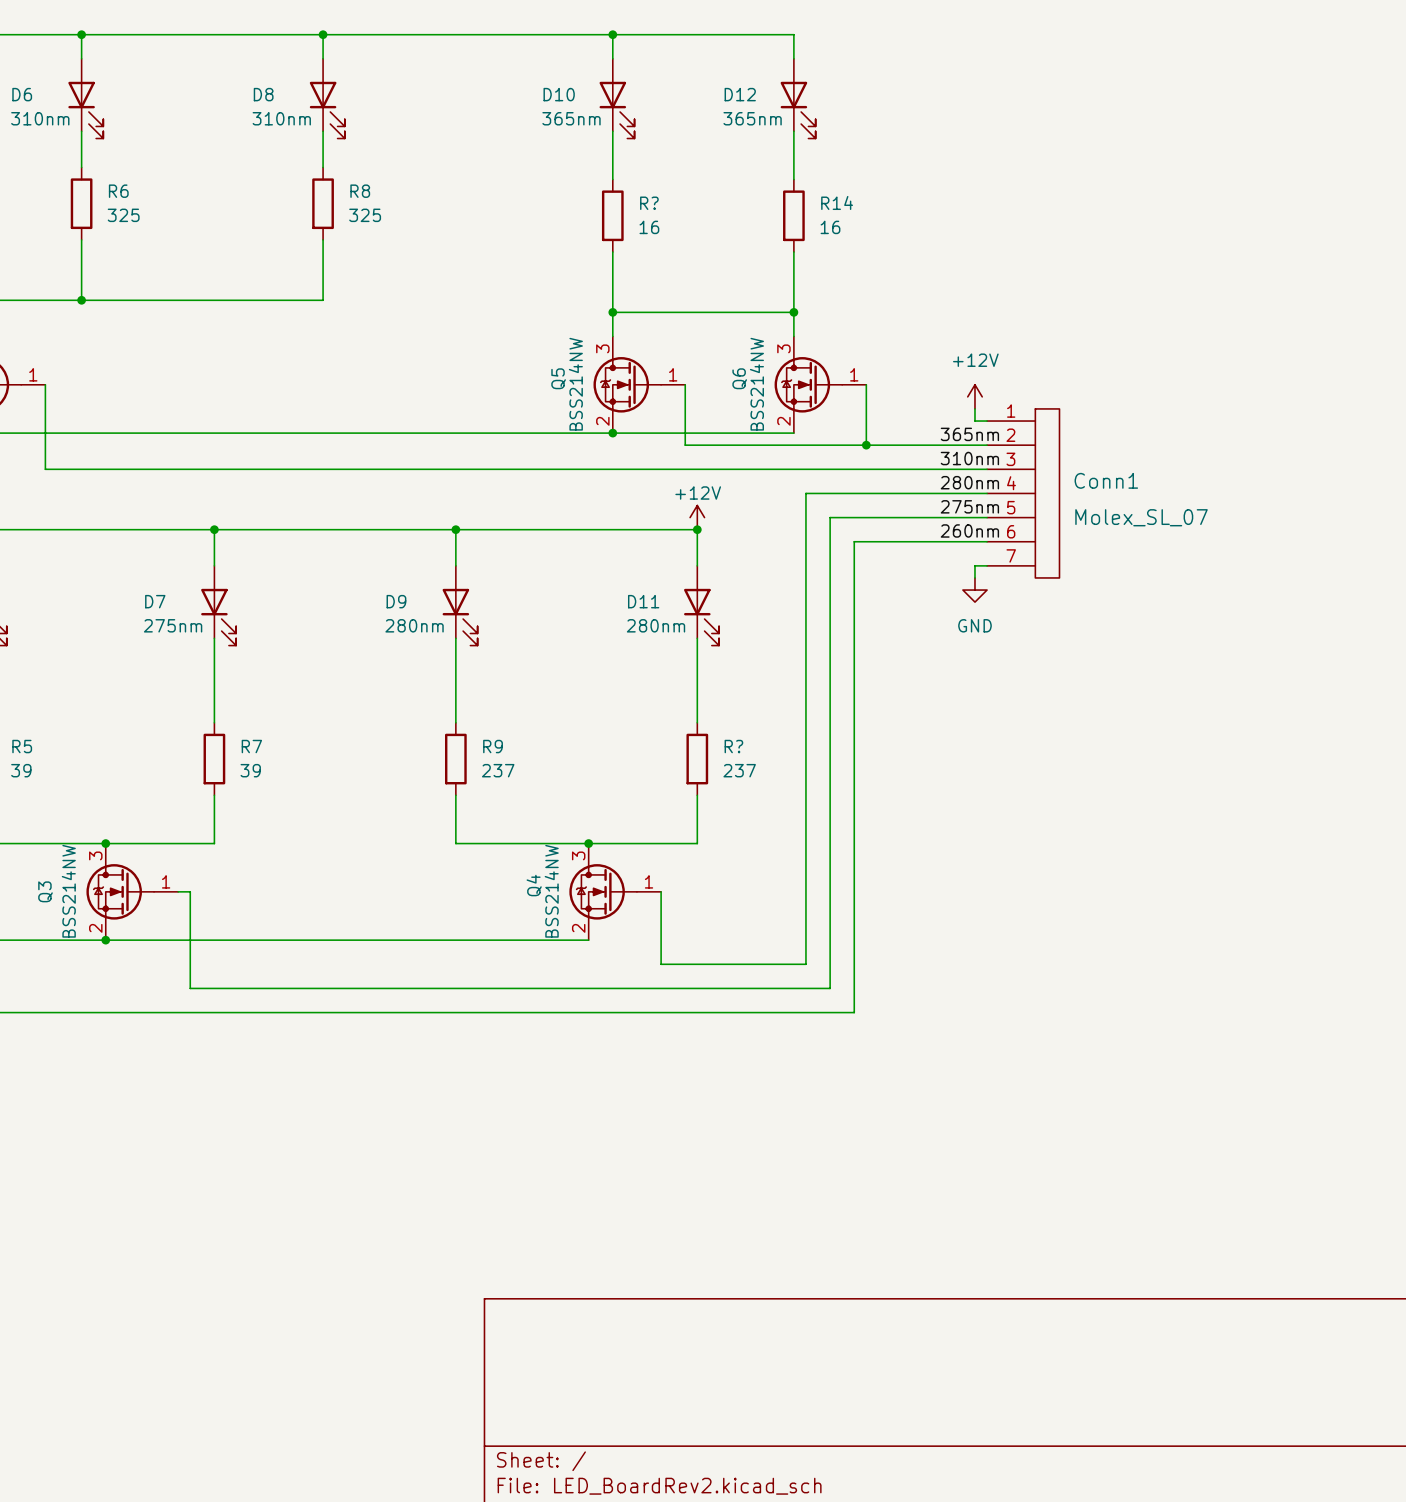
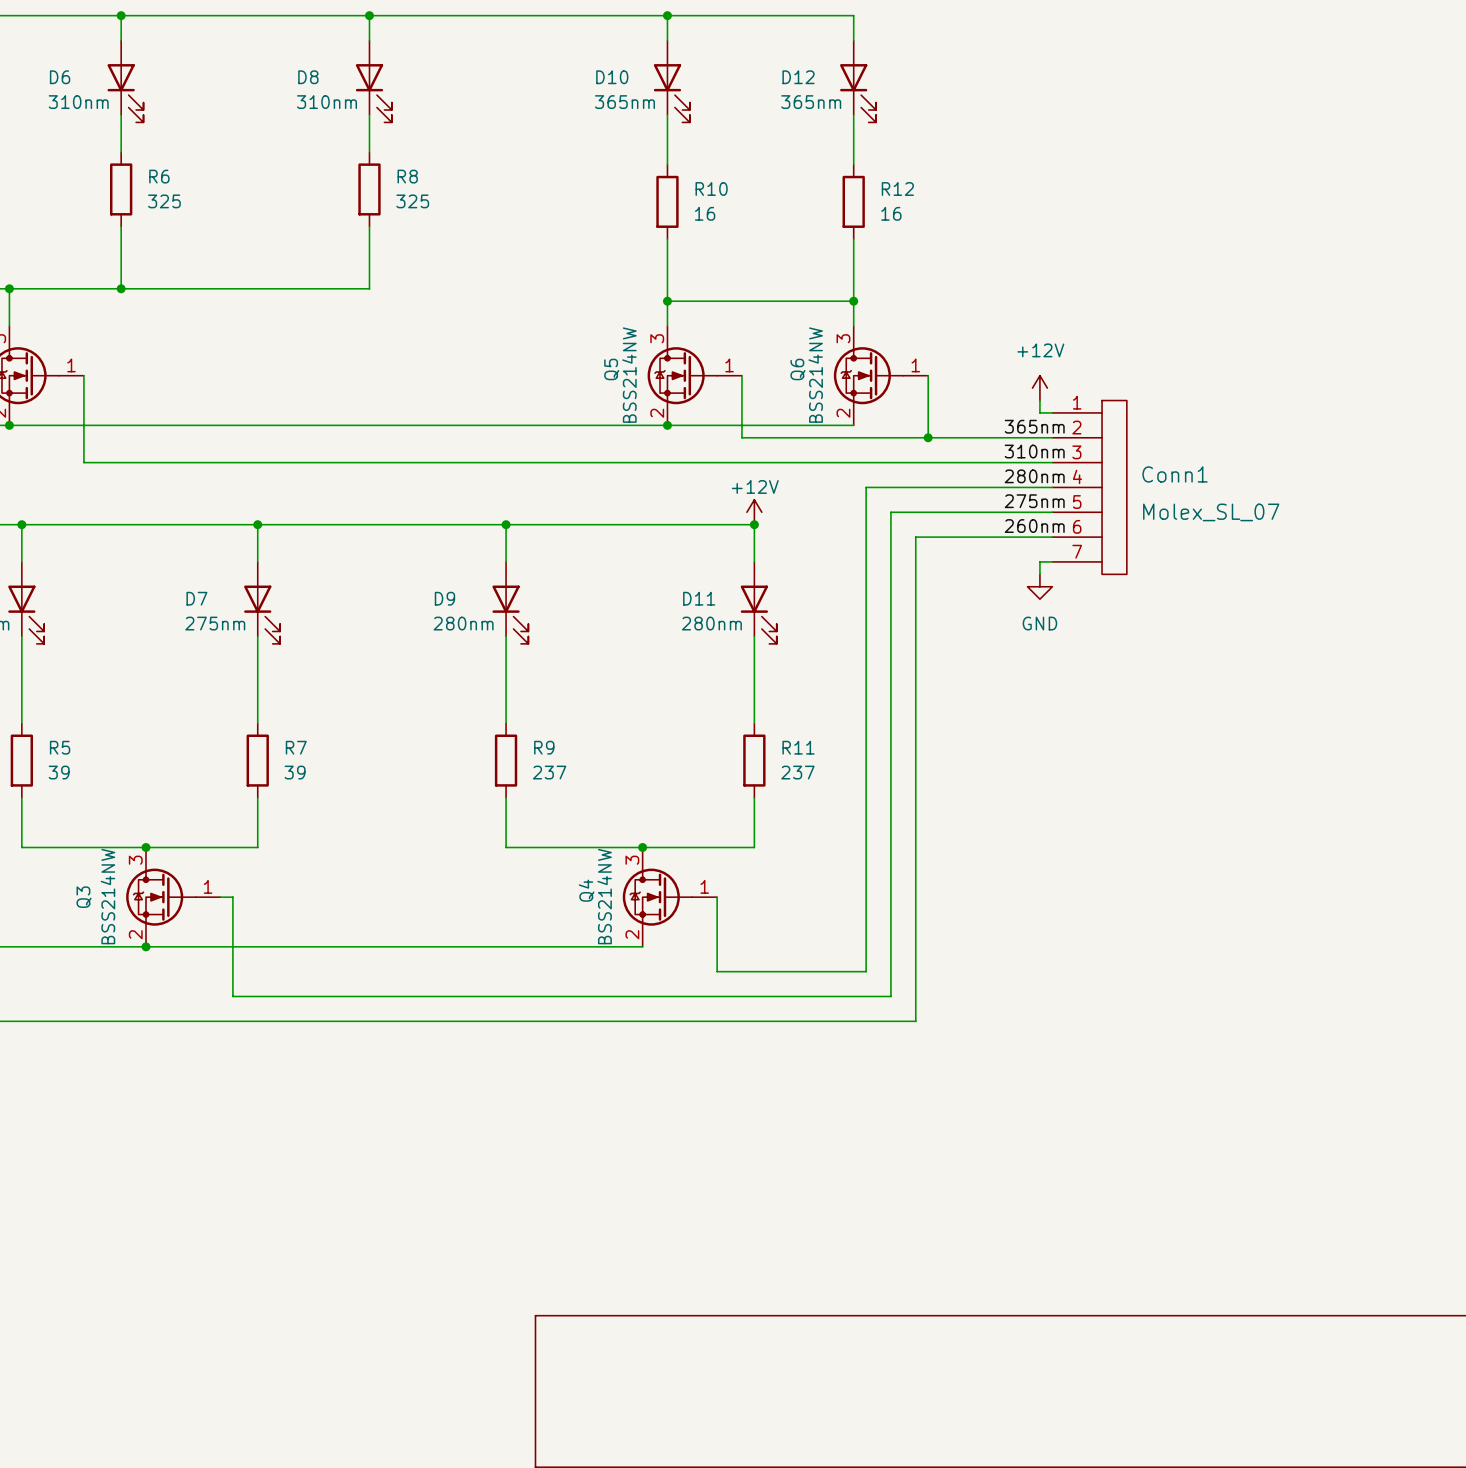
R14 name: R14 (837, 202) -> R12 (897, 189)
R? name: R? (649, 203) -> R10 (711, 189)
R? name: R? (733, 746) -> R11 (798, 747)

